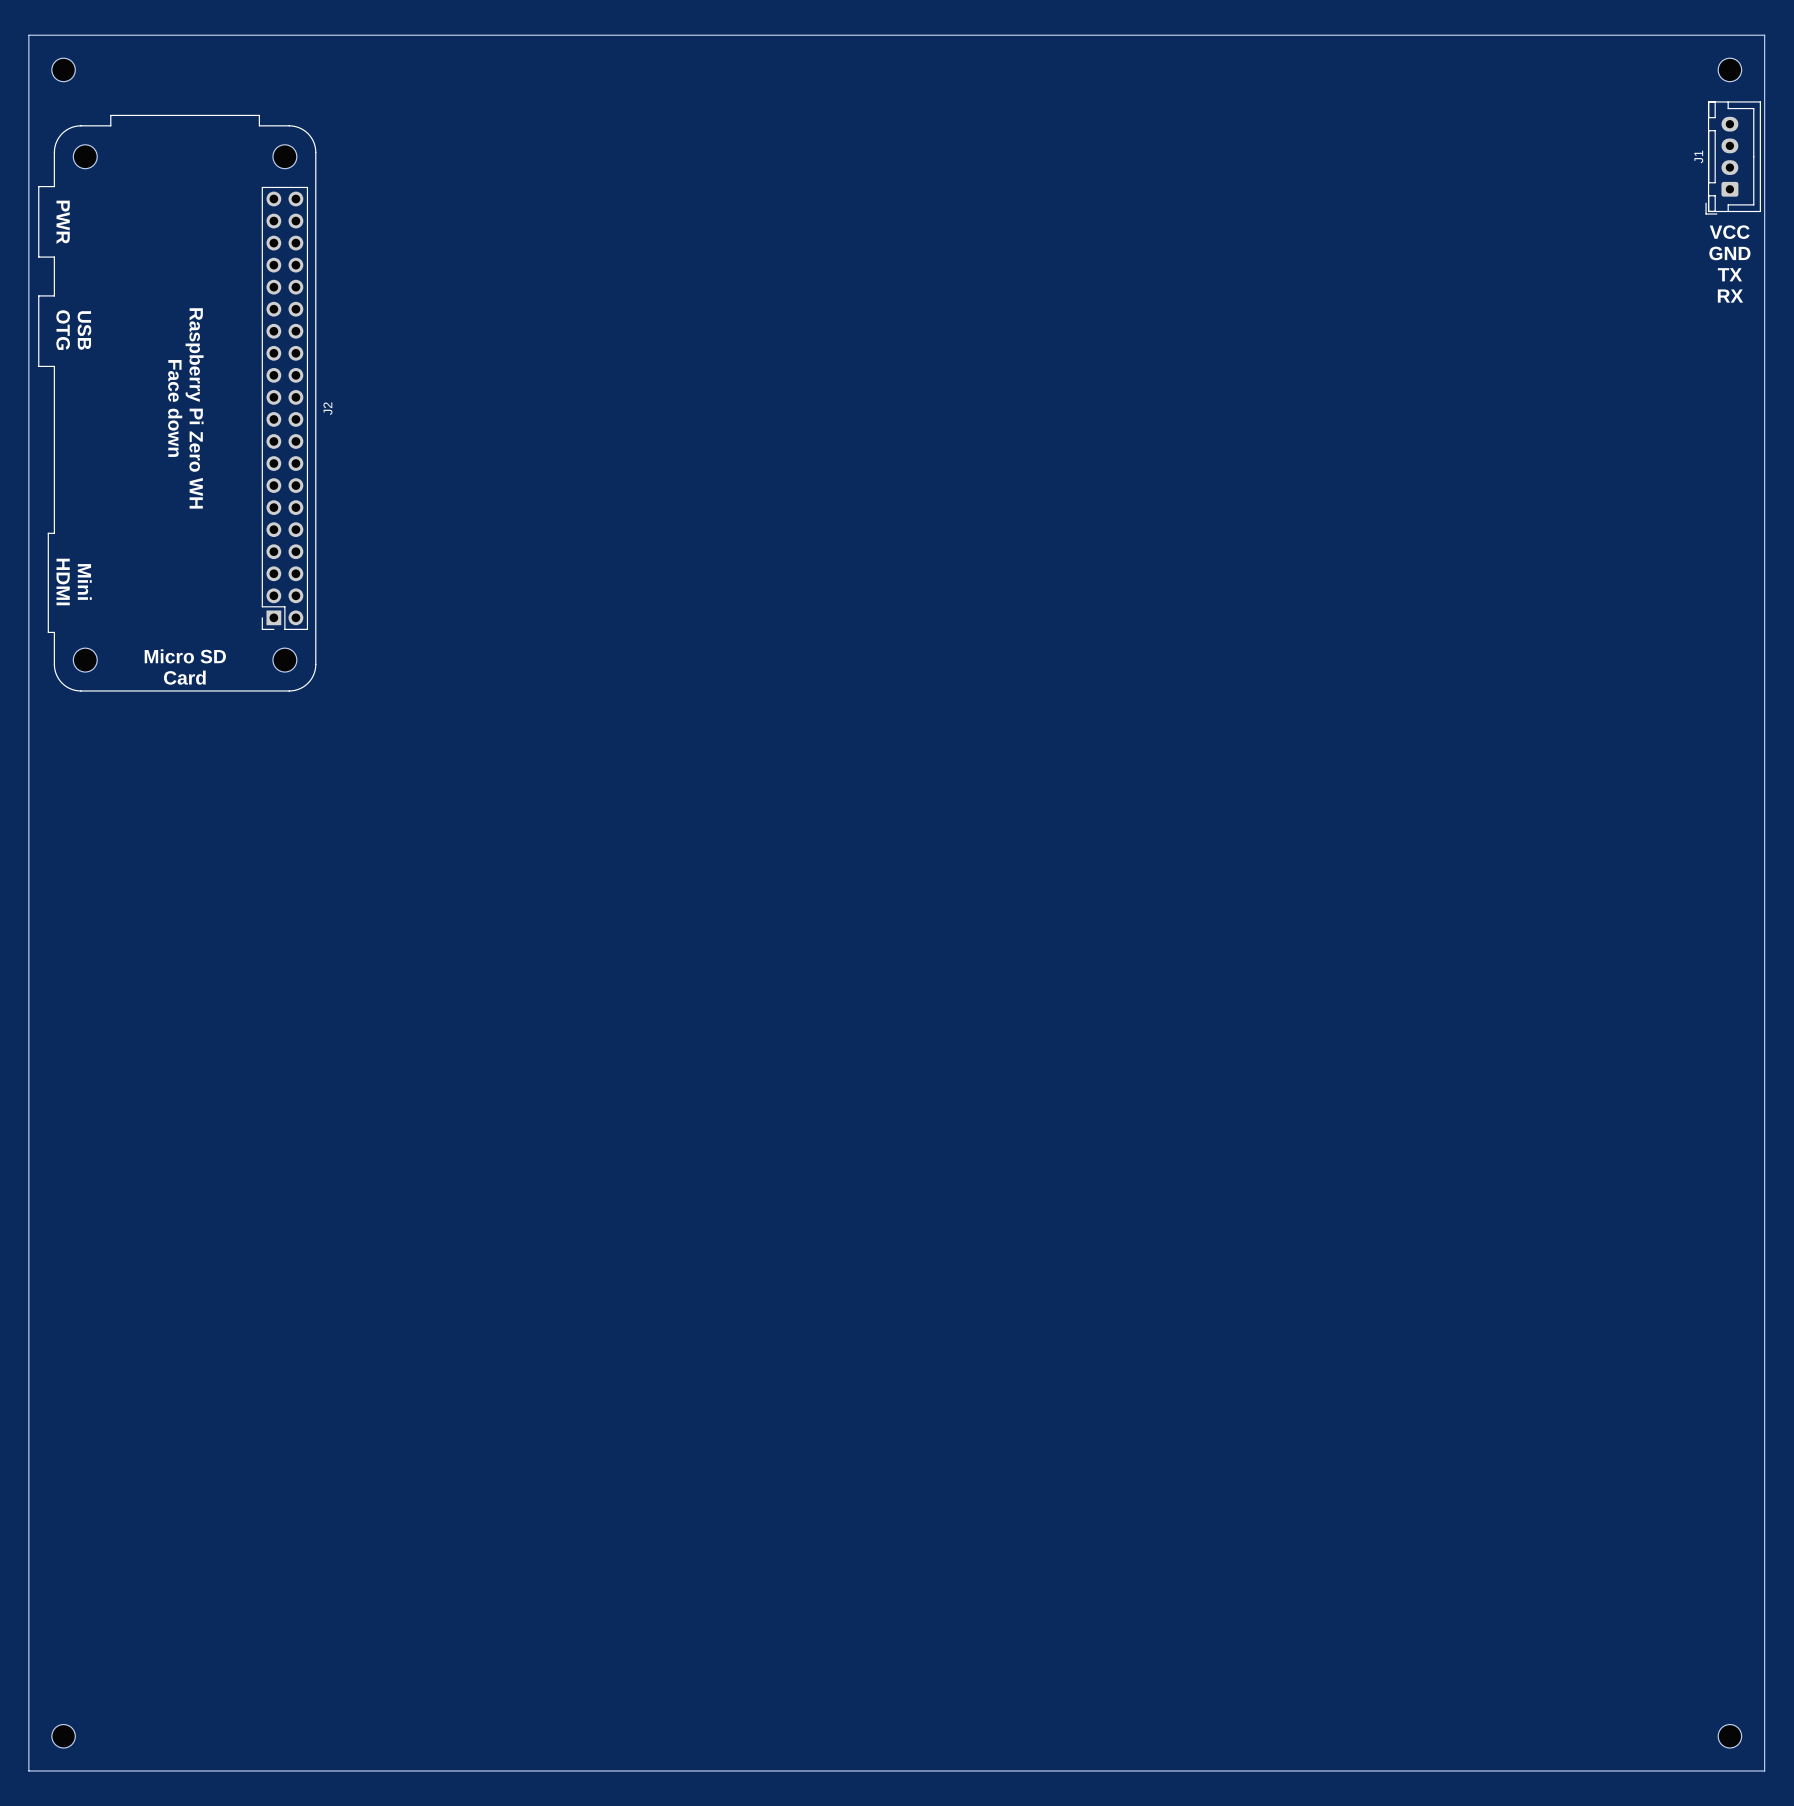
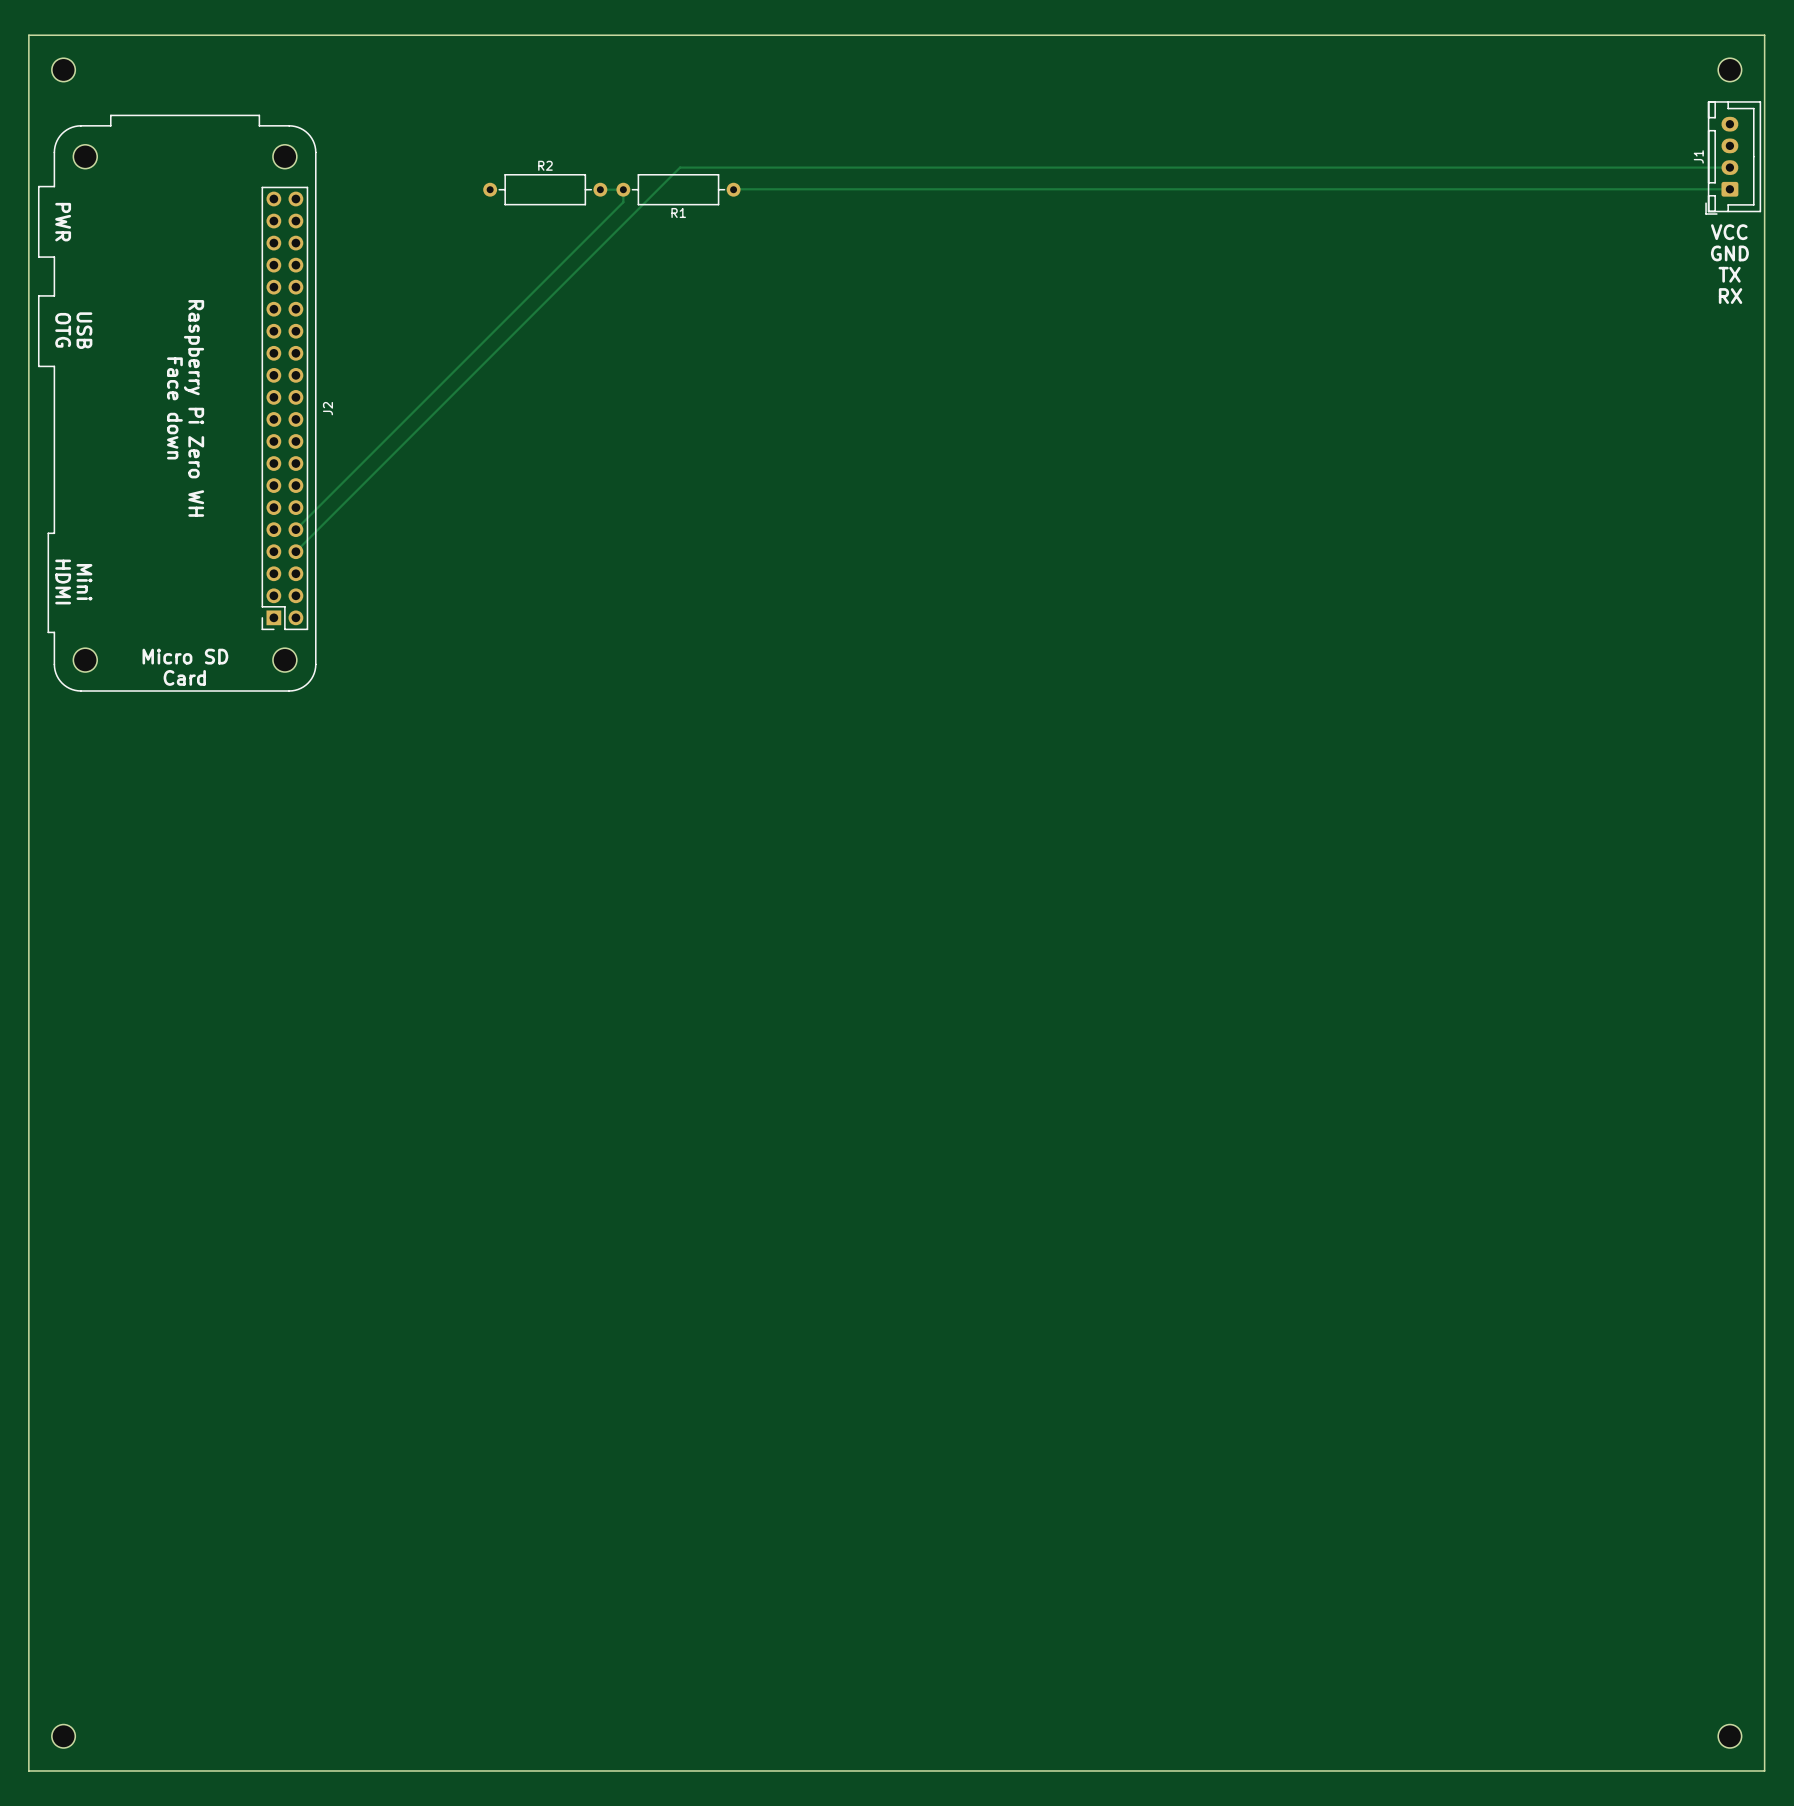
track: none -> (1729, 167) (680, 167) (295, 551)
R2: none -> (545, 189)
track: none -> (600, 189) (623, 189) (623, 202) (295, 529)
R1: none -> (678, 189)
track: none -> (1729, 189) (733, 189)

